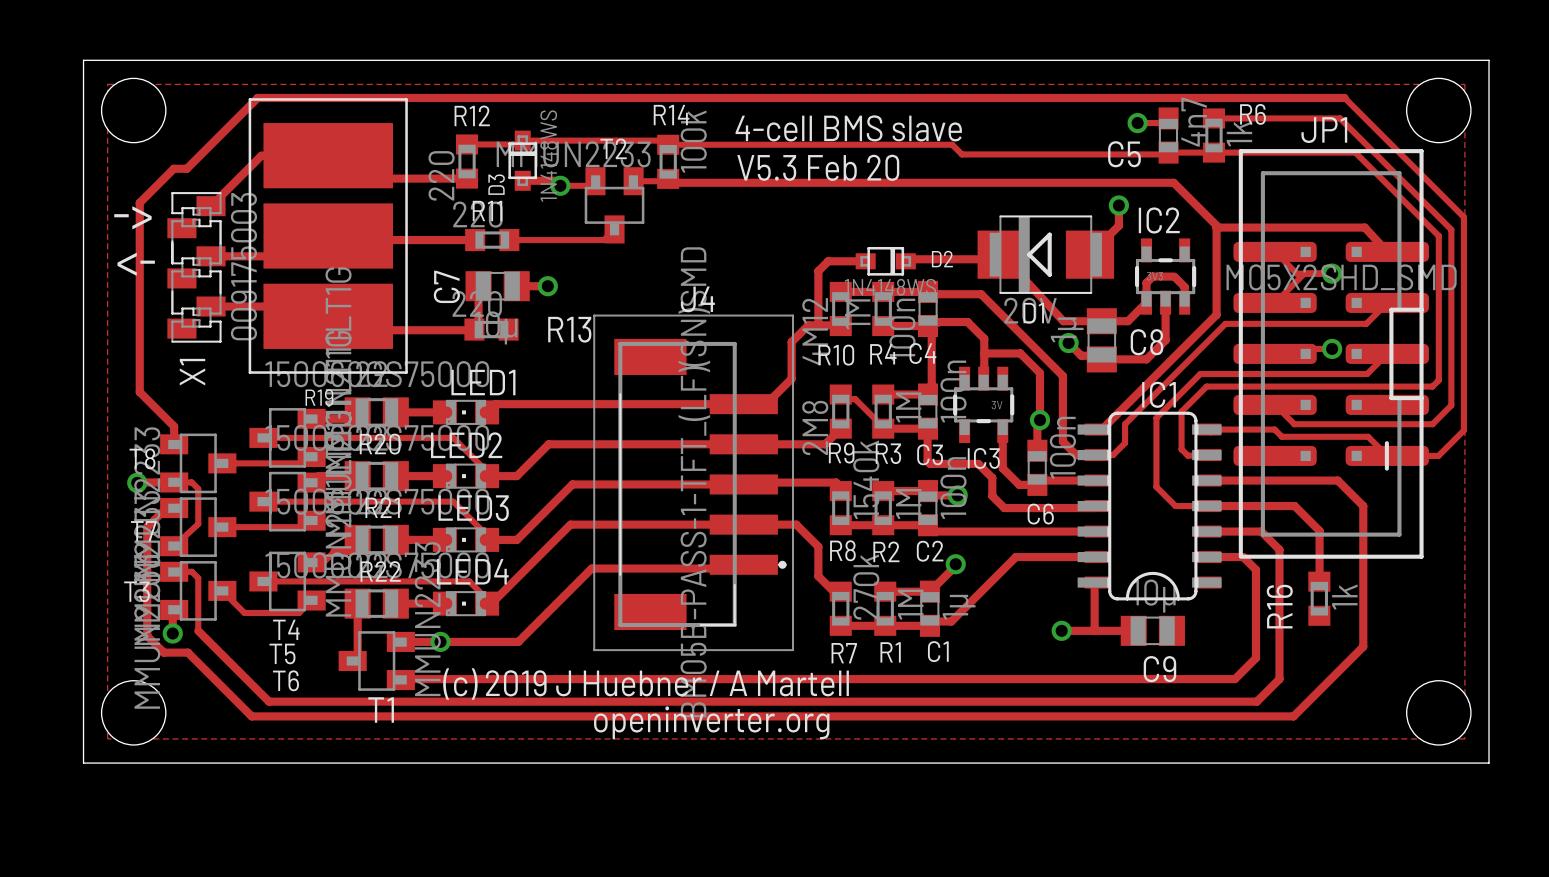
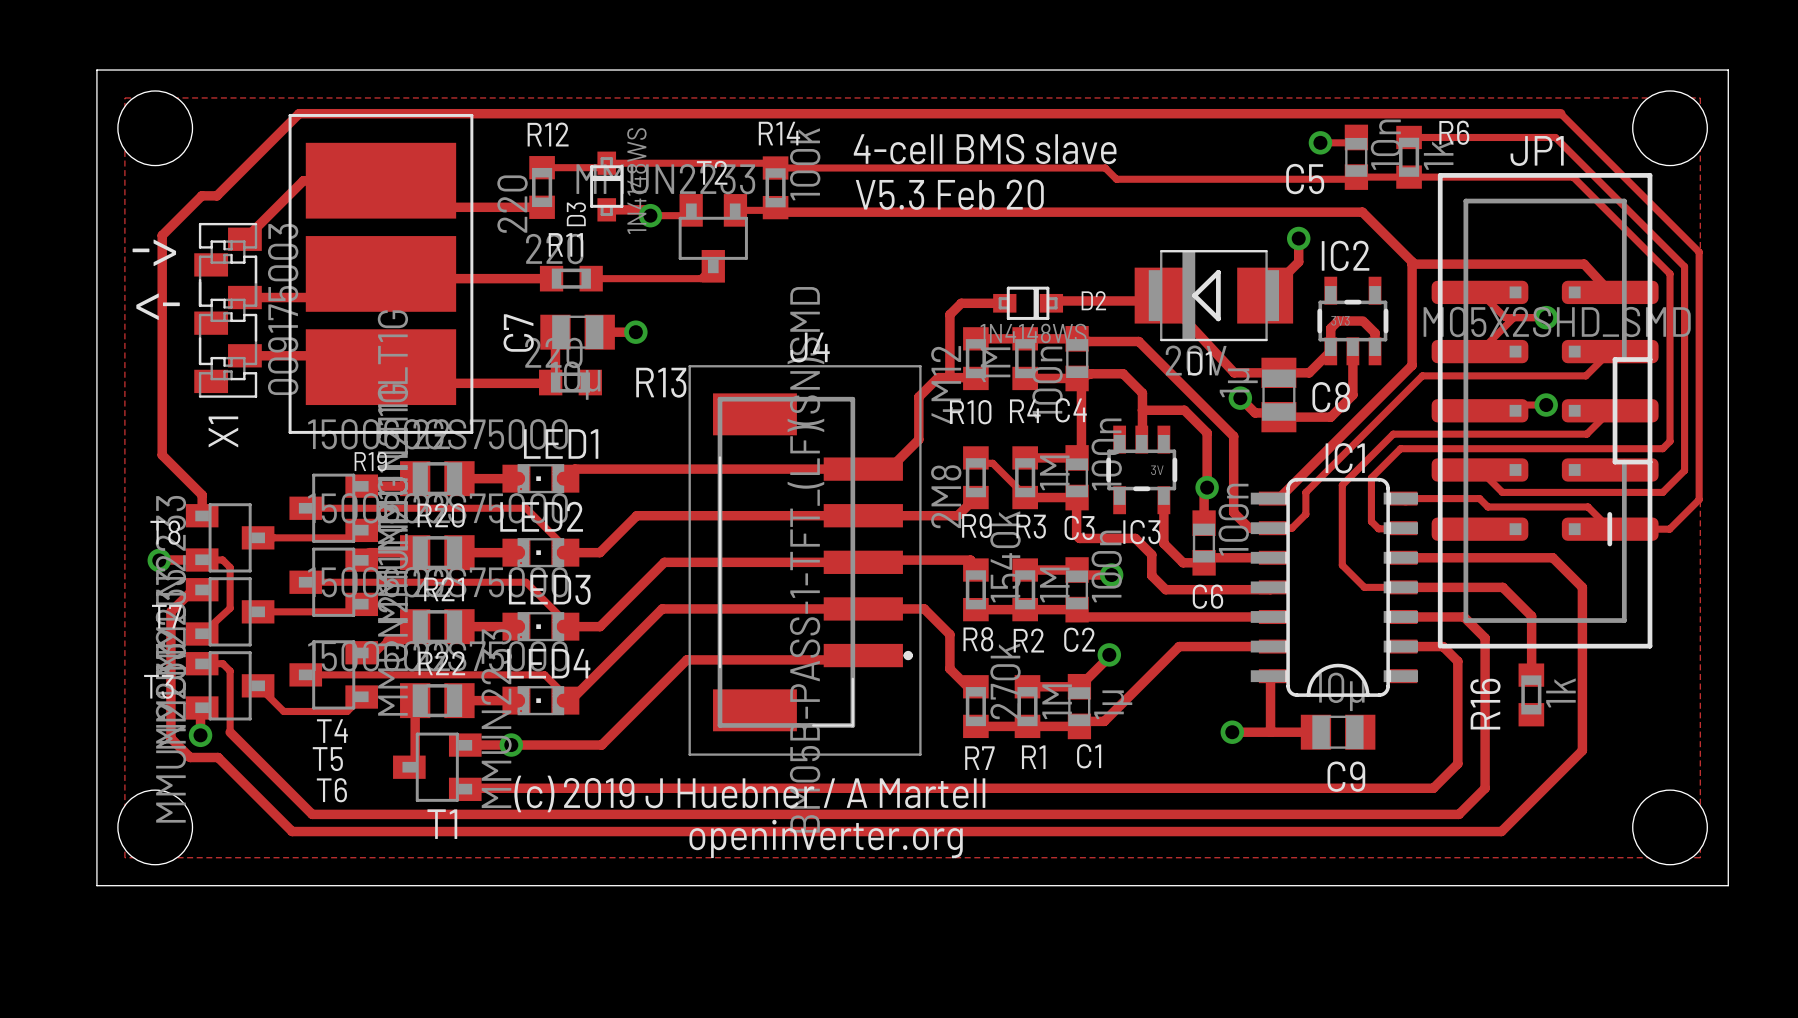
C5 value: 4n7 (1194, 122) -> 10n (1386, 144)

